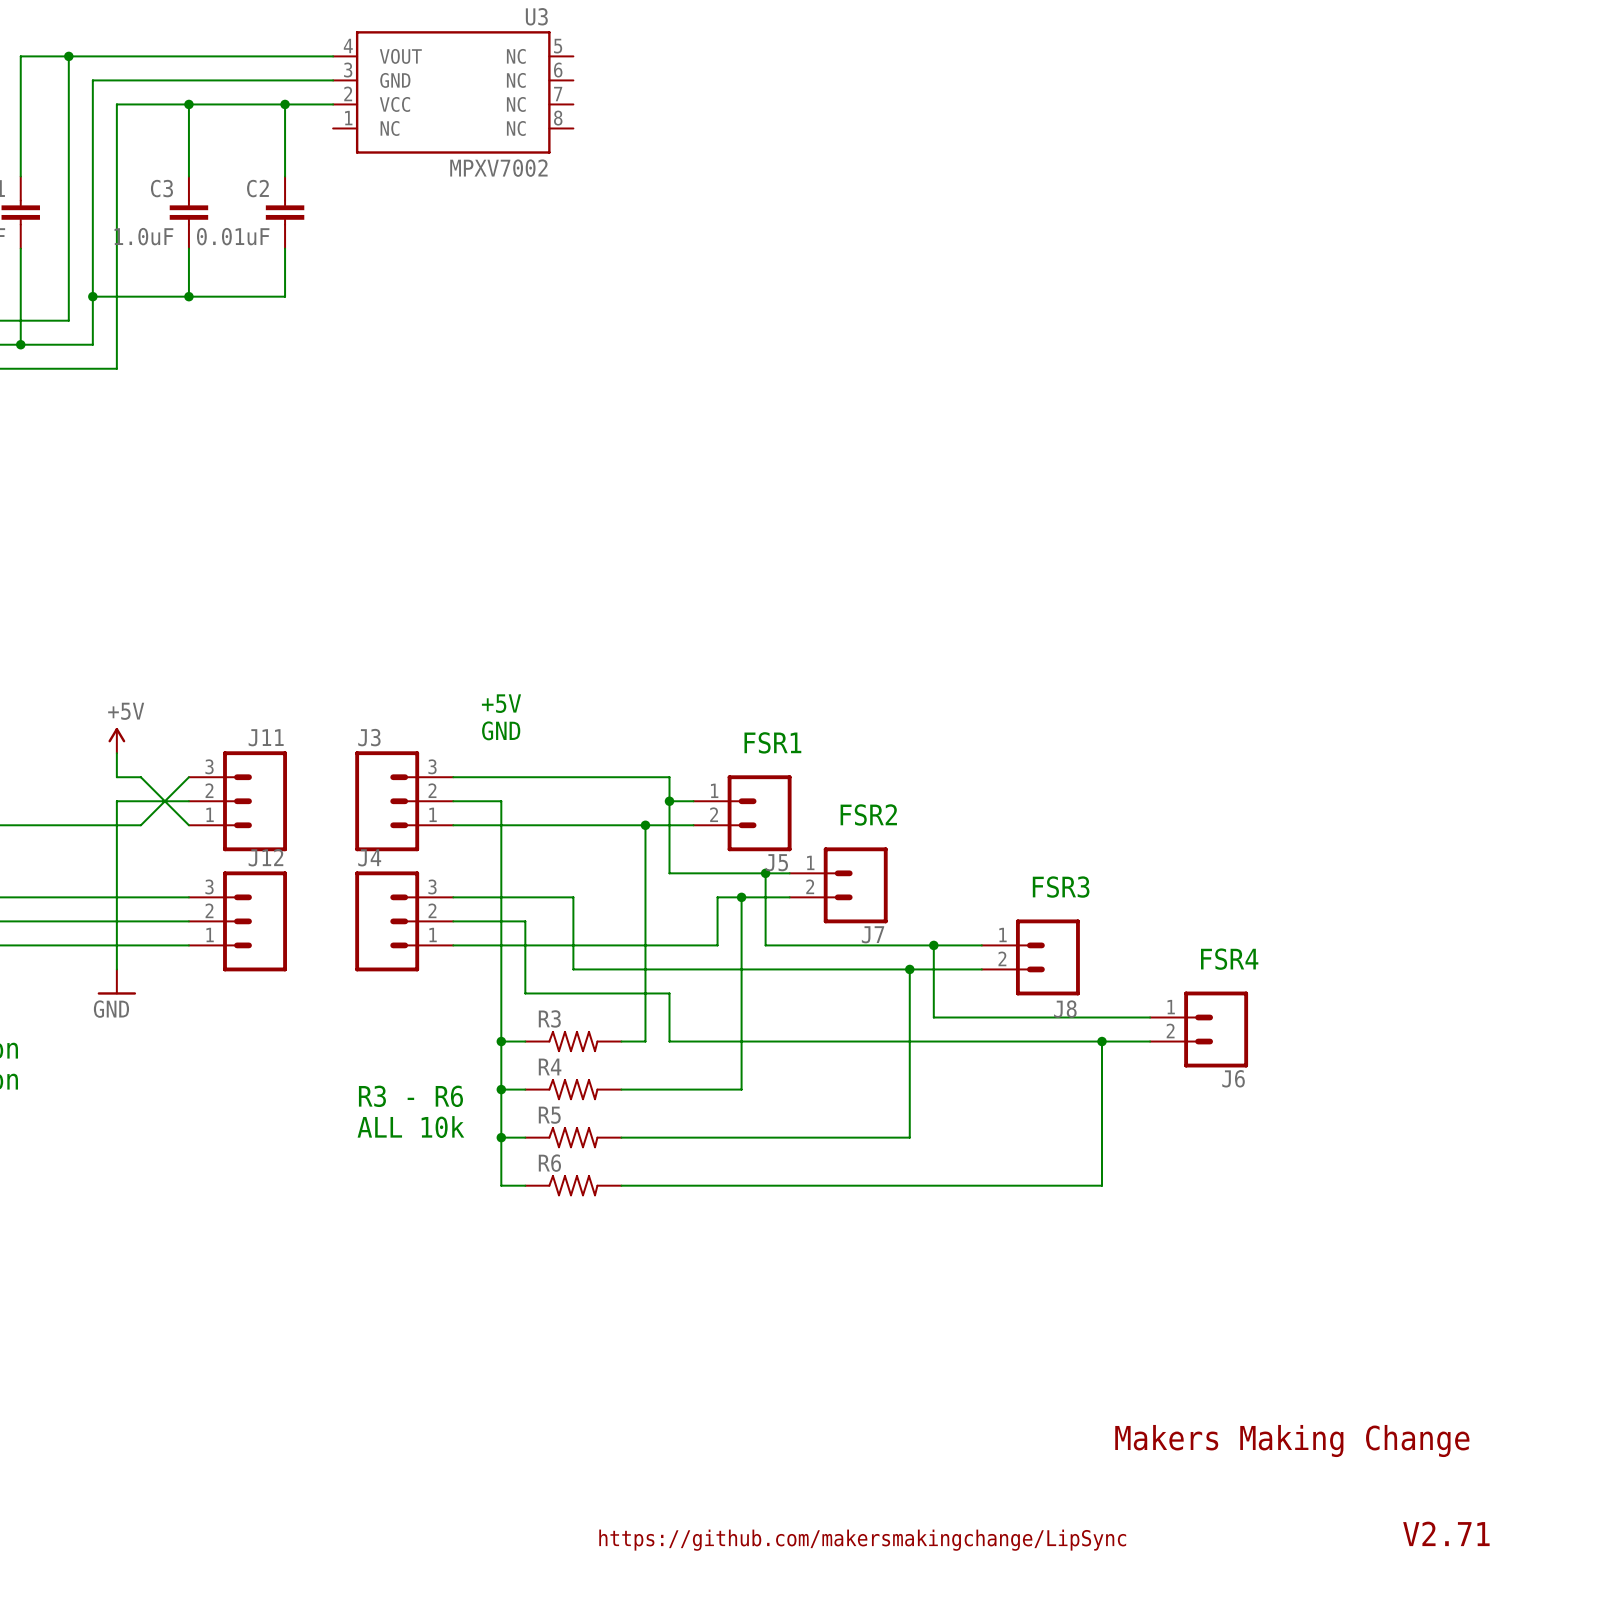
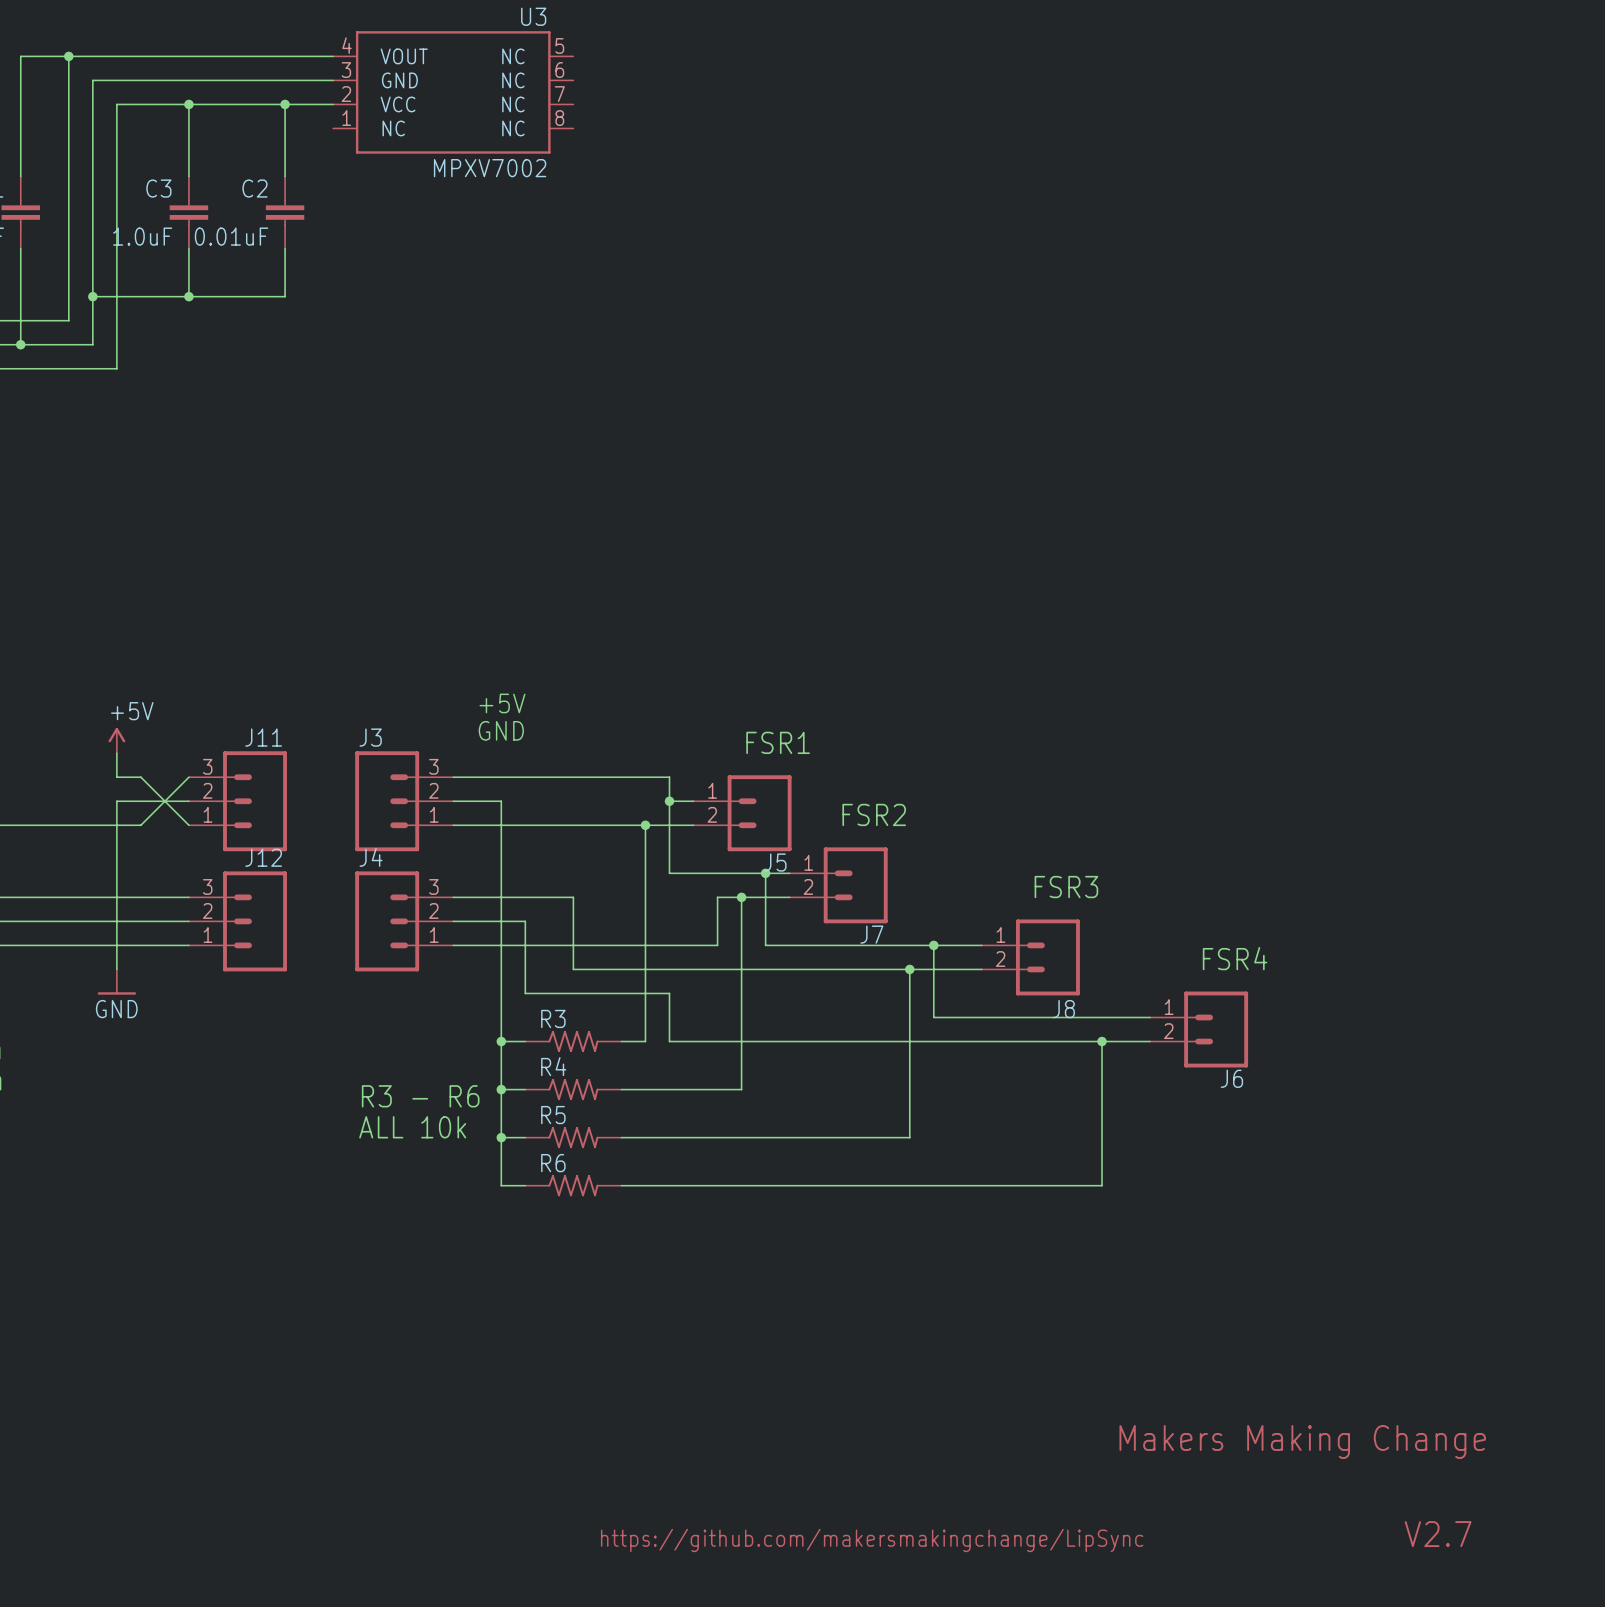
text: V2.71 (1446, 1533) -> V2.7 (1438, 1534)

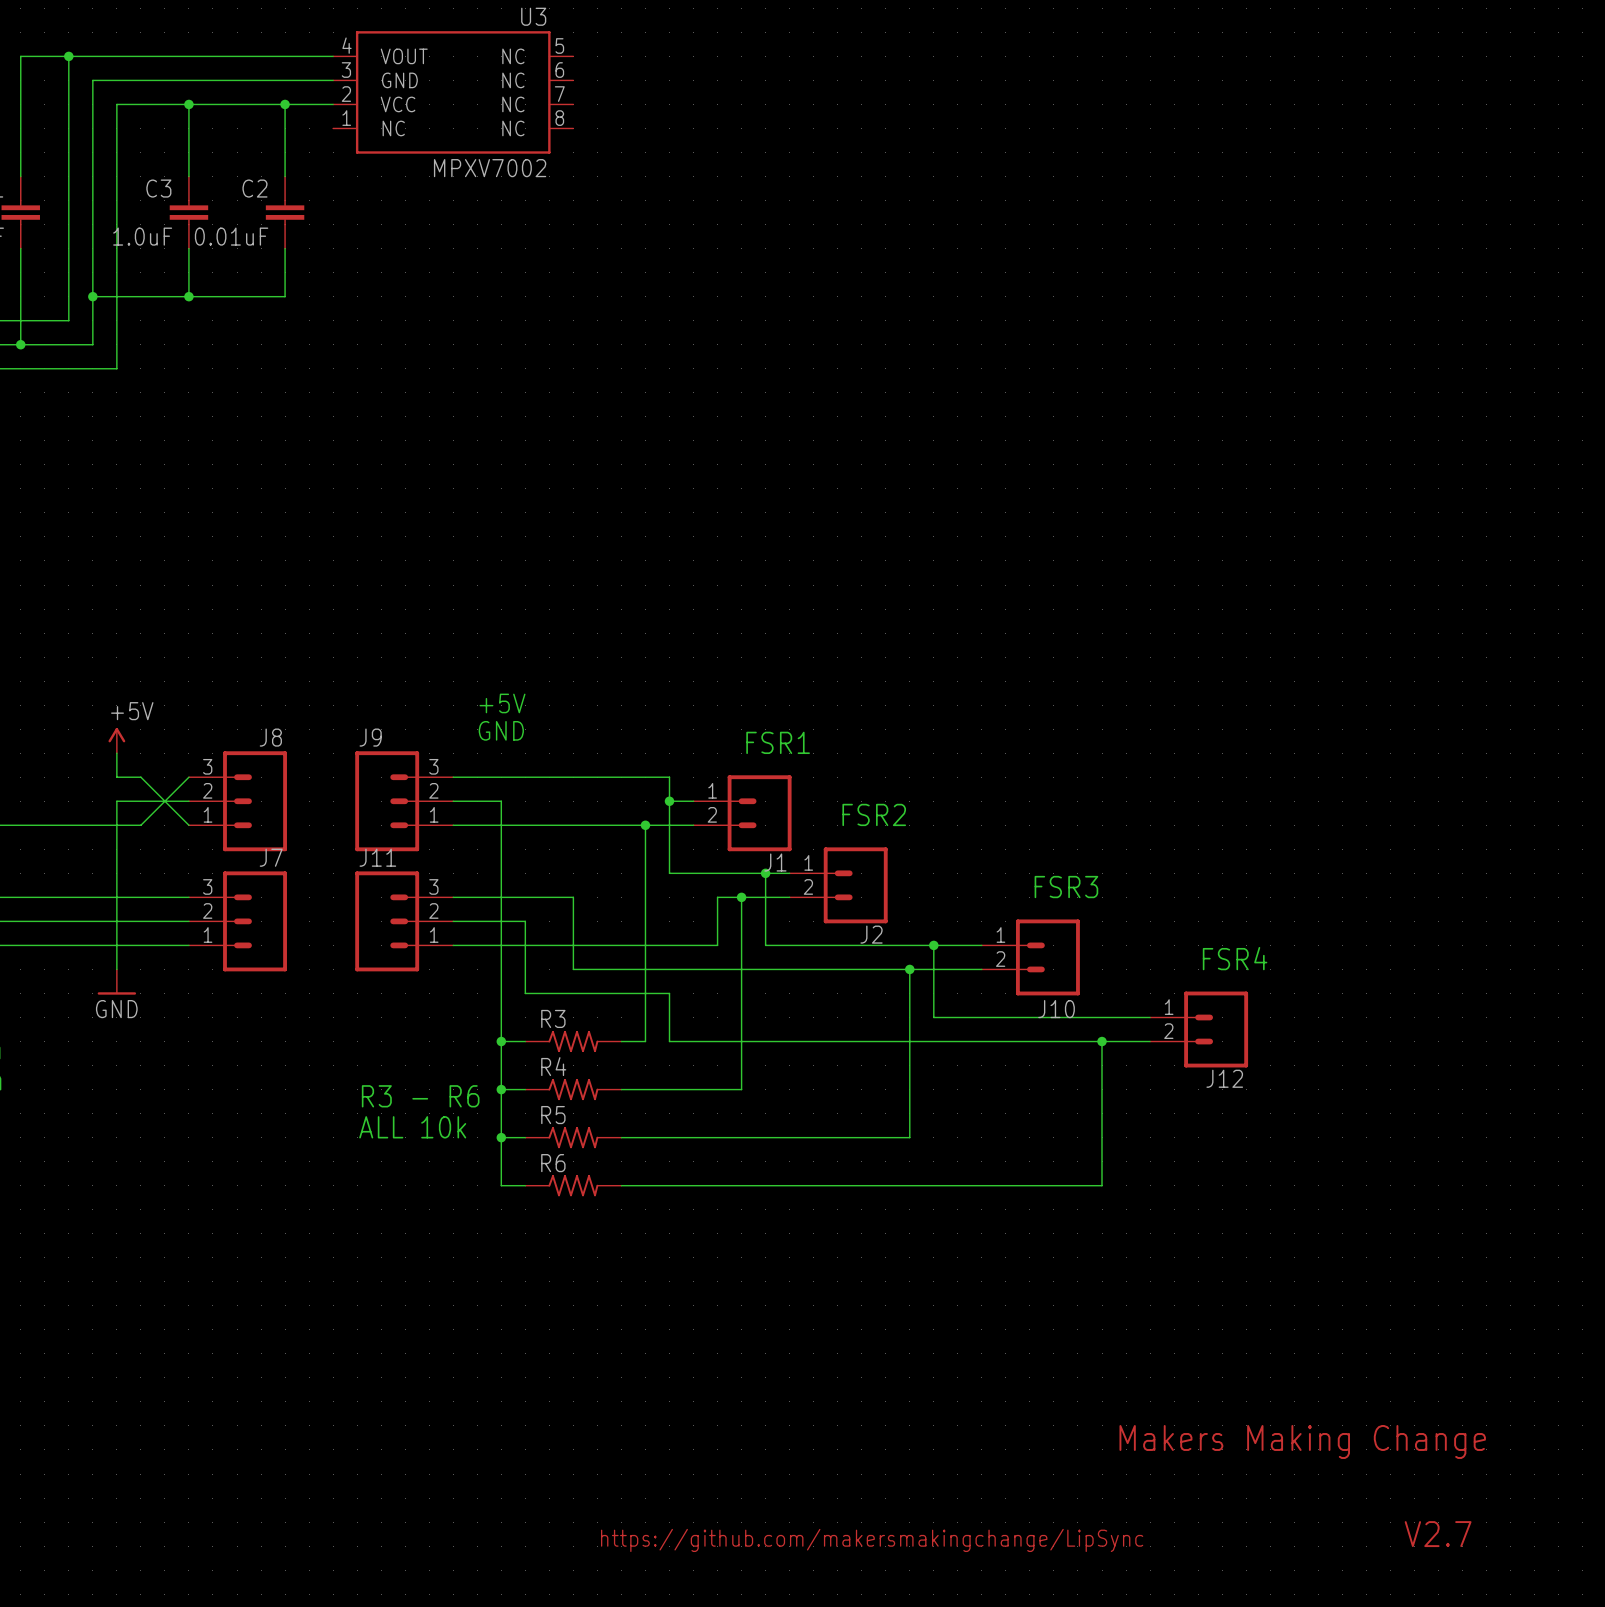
J11 name: J11 (263, 737) -> J8 (270, 737)
J3 name: J3 (370, 737) -> J9 (370, 737)
J12 name: J12 (263, 857) -> J7 (271, 857)
J4 name: J4 (371, 857) -> J11 (377, 857)
J5 name: J5 (775, 862) -> J1 (775, 862)
J7 name: J7 (871, 934) -> J2 (871, 934)
J8 name: J8 (1063, 1009) -> J10 (1056, 1009)
J6 name: J6 (1231, 1078) -> J12 (1224, 1078)

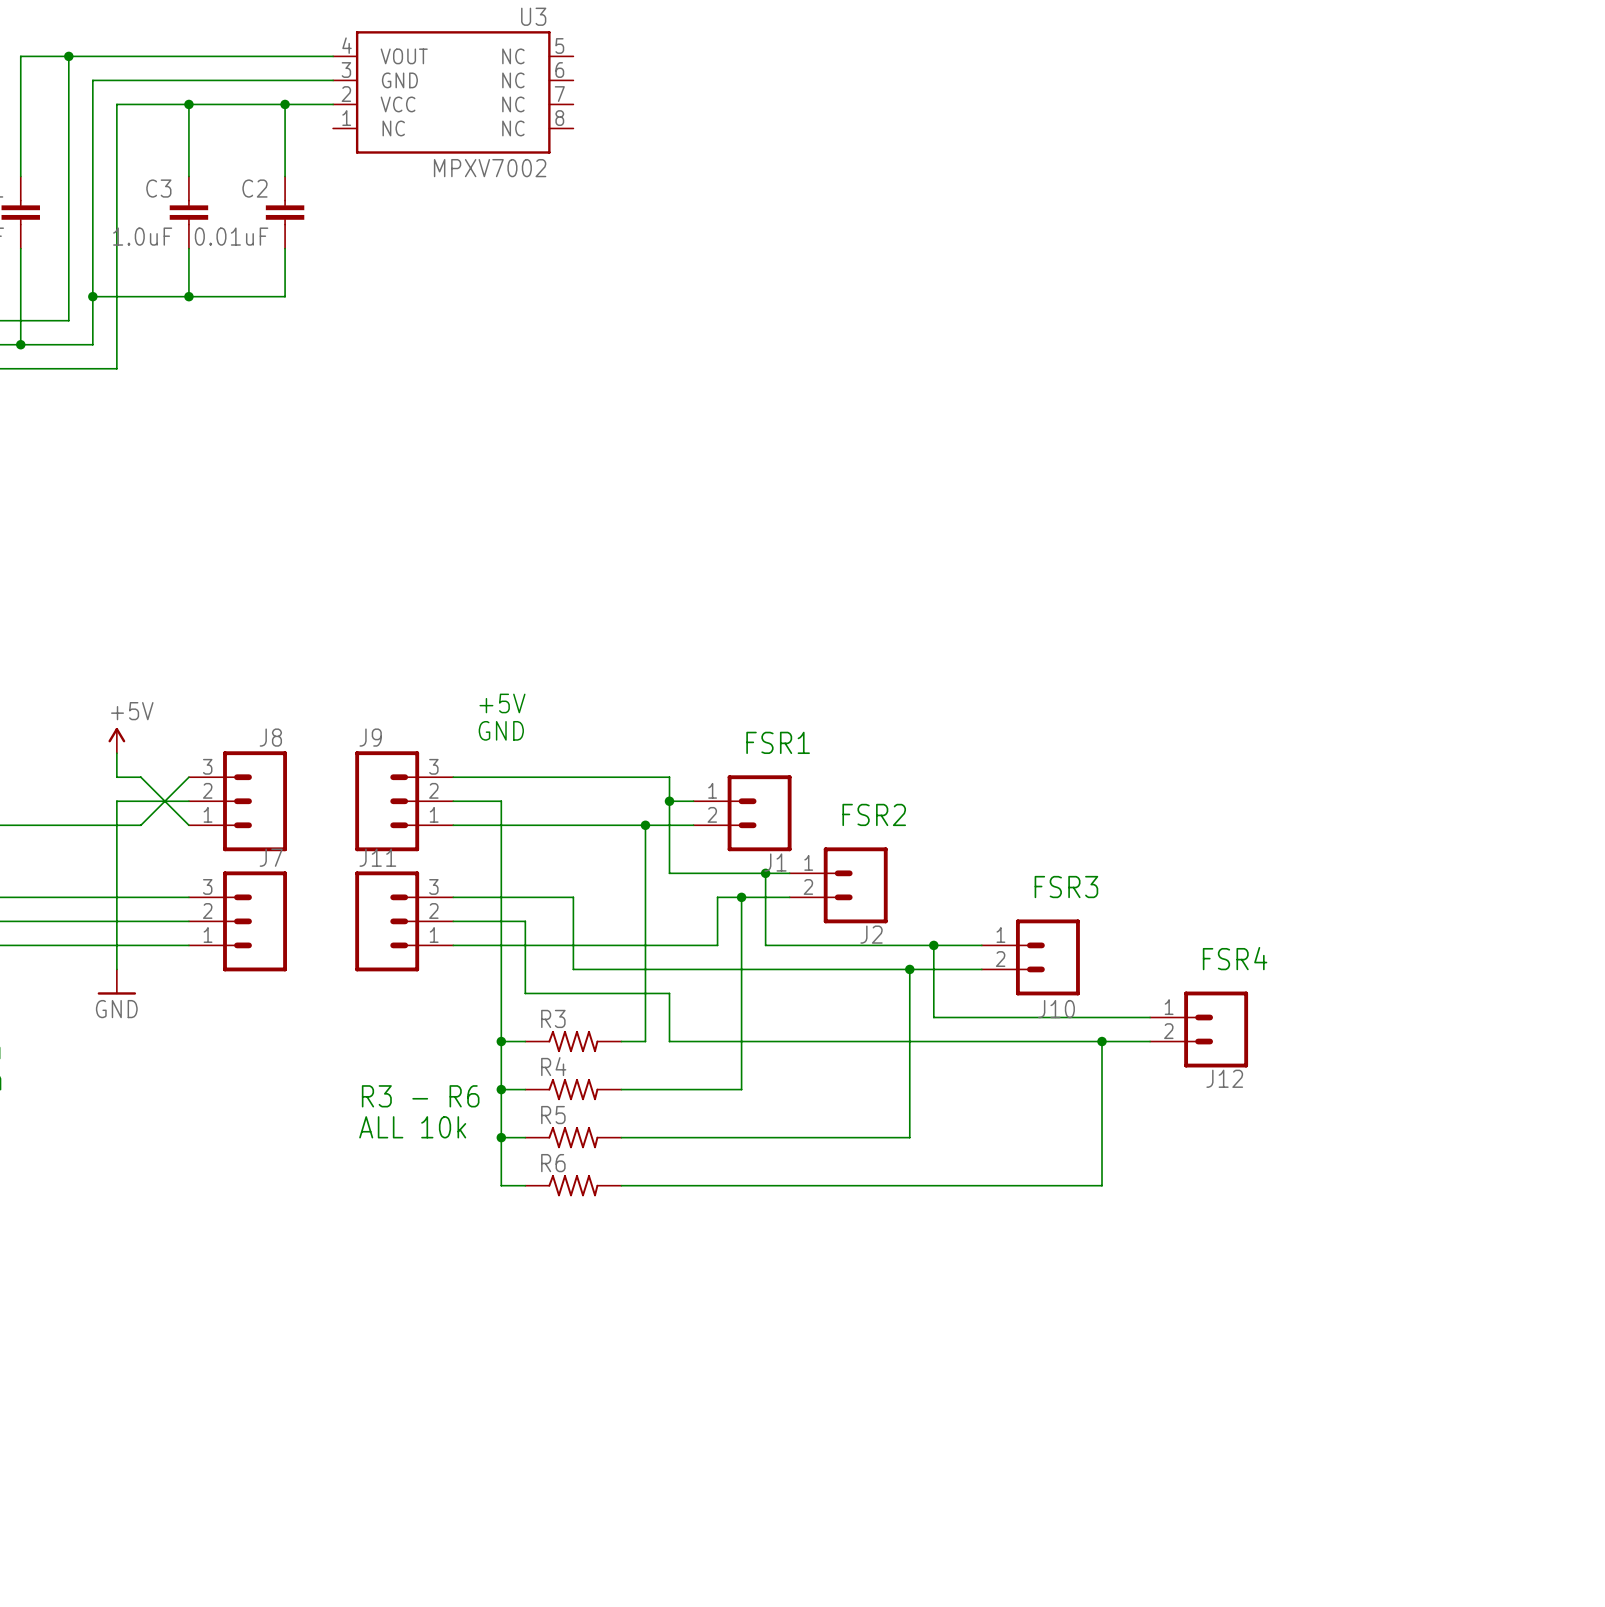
text: Makers Making Change (1302, 1441) -> none
text: V2.7 (1438, 1534) -> none
text: https://github.com/makersmakingchange/LipSync (872, 1540) -> none

